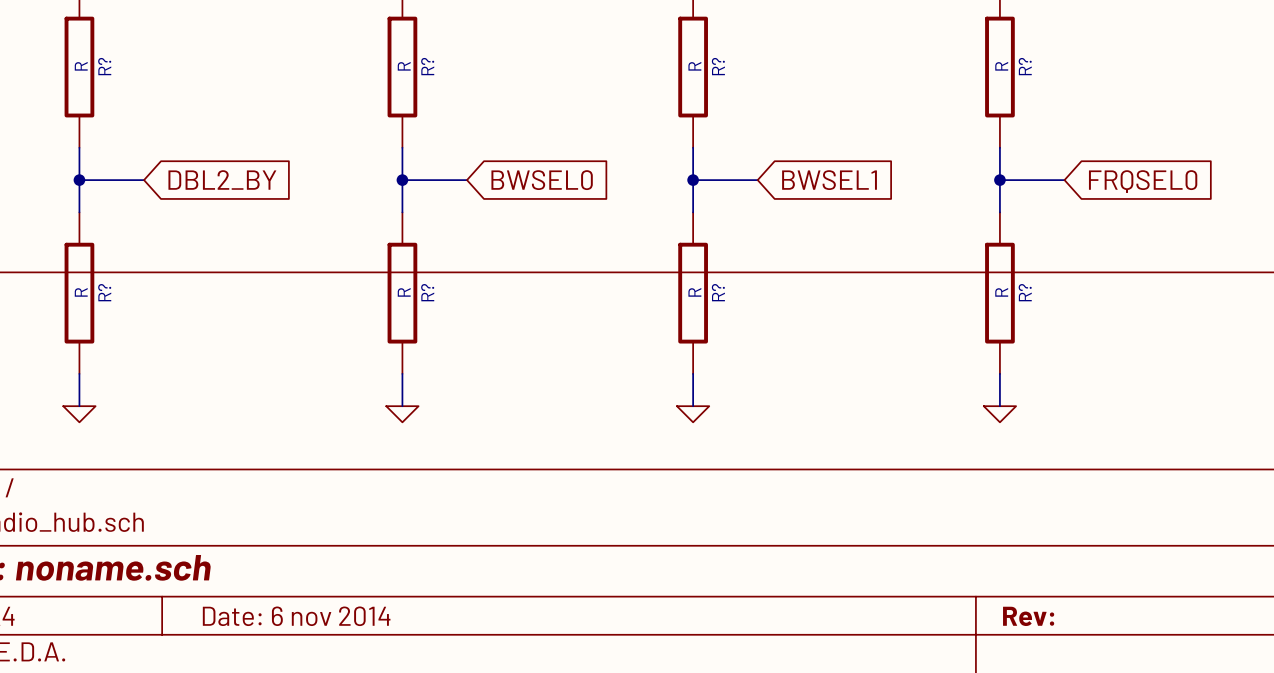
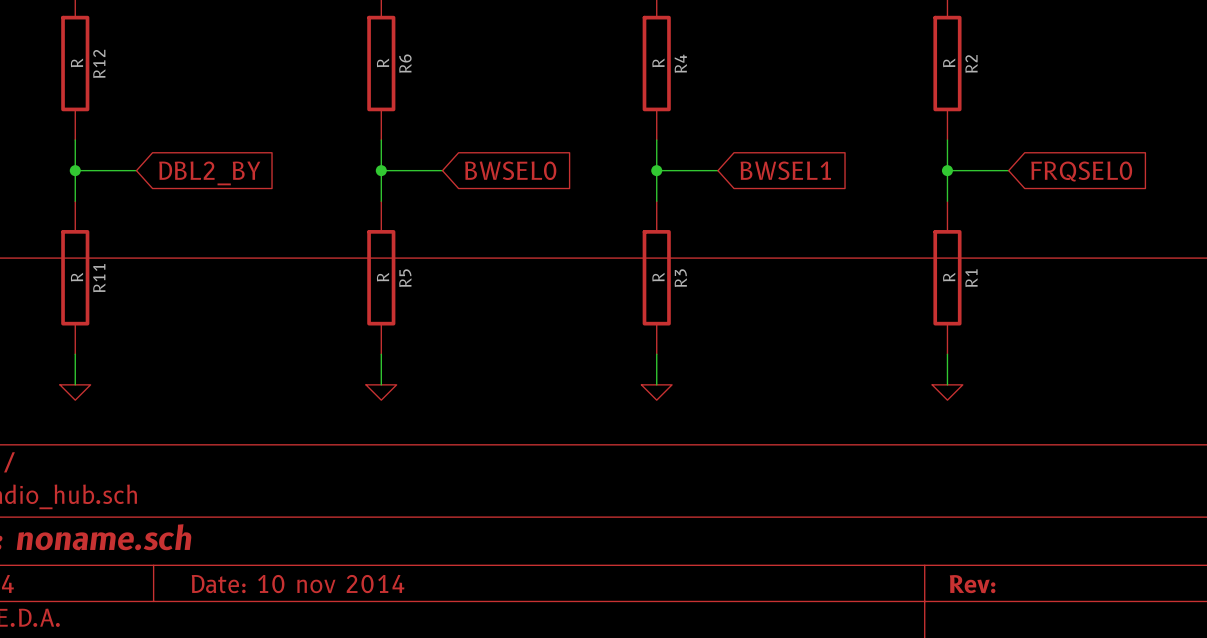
R? name: R? (104, 66) -> R12 (99, 63)
R? name: R? (427, 66) -> R6 (405, 63)
R? name: R? (718, 66) -> R4 (680, 63)
R? name: R? (1025, 66) -> R2 (971, 63)
R? name: R? (104, 292) -> R11 (99, 278)
R? name: R? (427, 292) -> R5 (405, 278)
R? name: R? (718, 292) -> R3 (680, 278)
R? name: R? (1025, 292) -> R1 (971, 278)
title block: Date: 6 nov 2014 (296, 616) -> Date: 10 nov 2014 (298, 584)

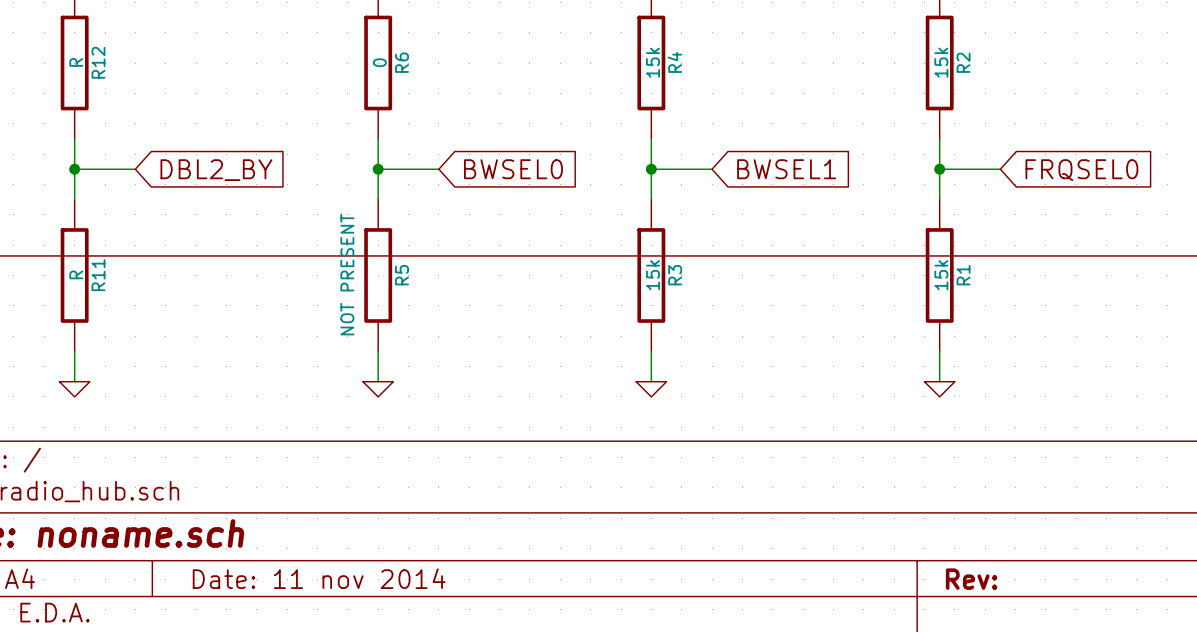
R6 value: R (383, 62) -> 0 (379, 62)
R4 value: R (658, 62) -> 15k (653, 62)
R2 value: R (949, 62) -> 15k (941, 62)
R5 value: R (383, 277) -> NOT PRESENT (347, 274)
R3 value: R (658, 277) -> 15k (653, 275)
R1 value: R (949, 277) -> 15k (941, 275)
title block: Date: 10 nov 2014 (298, 584) -> Date: 11 nov 2014 (319, 578)

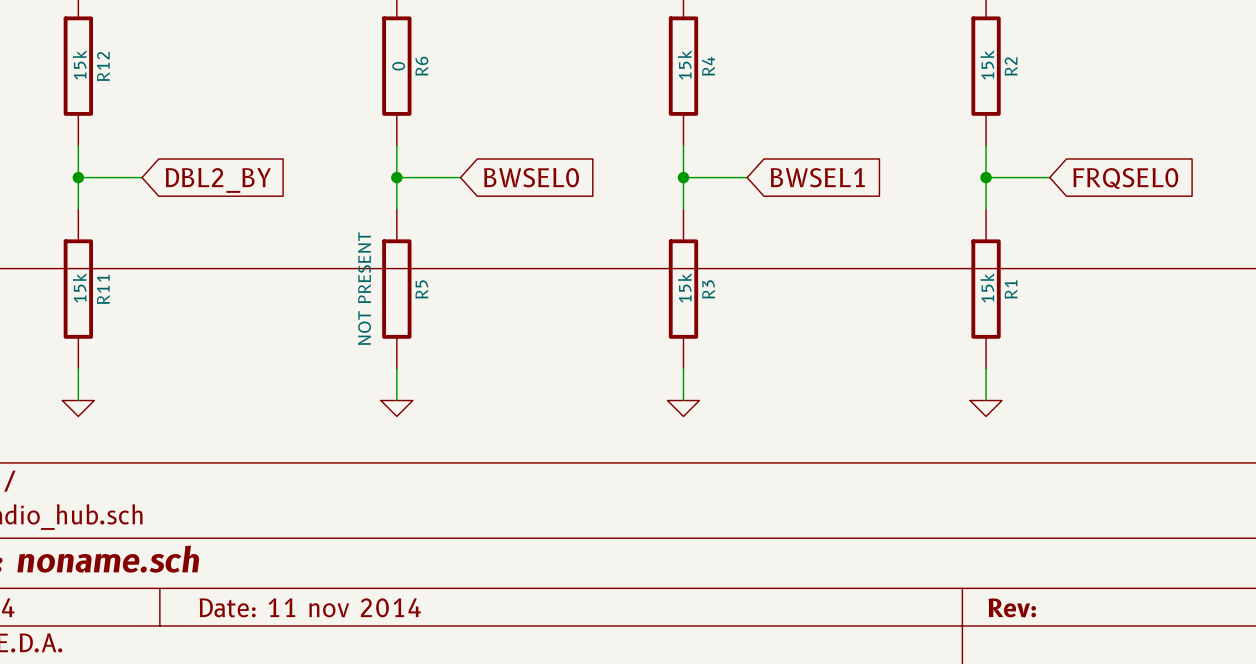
R12 value: R (76, 62) -> 15k (79, 64)
R11 value: R (76, 274) -> 15k (79, 287)

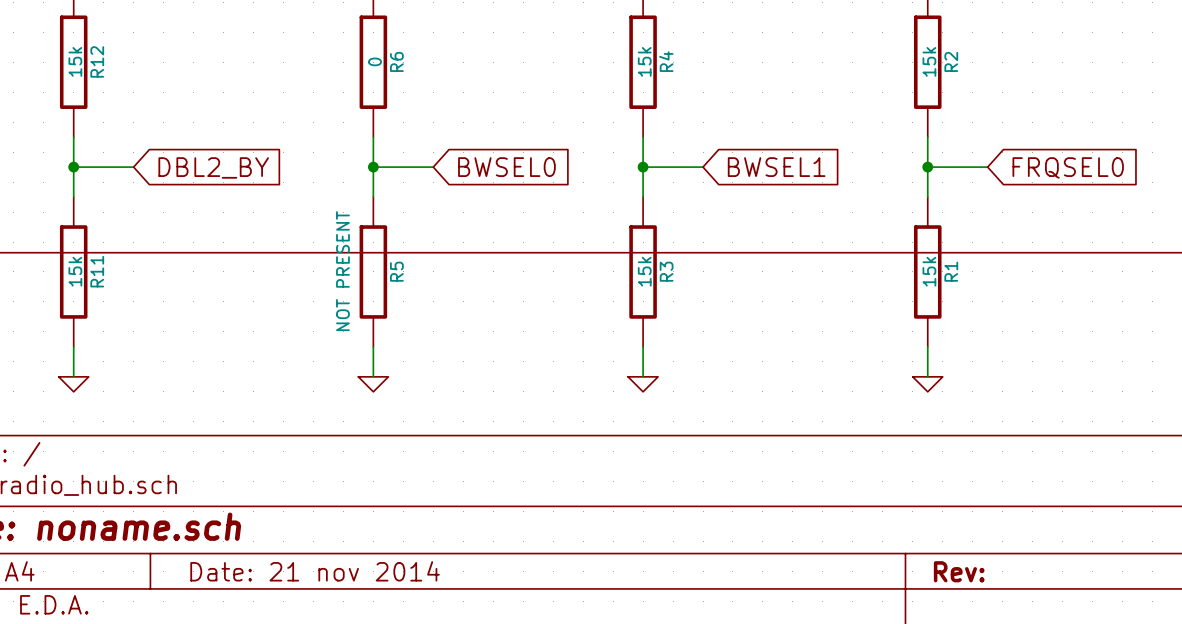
title block: Date: 11 nov 2014 (310, 607) -> Date: 21 nov 2014 (315, 571)

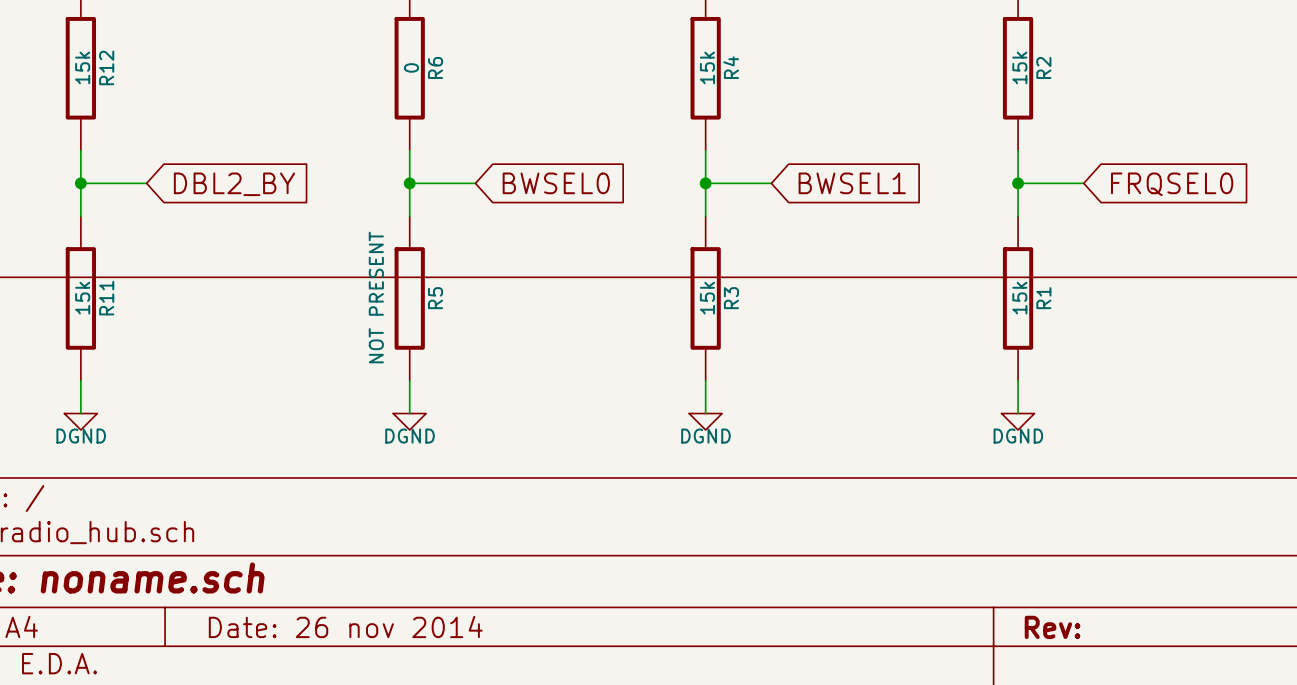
power symbol text: none -> DGND (81, 436)
power symbol text: none -> DGND (410, 436)
power symbol text: none -> DGND (705, 436)
power symbol text: none -> DGND (1018, 436)
title block: Date: 21 nov 2014 (315, 571) -> Date: 26 nov 2014 (345, 626)

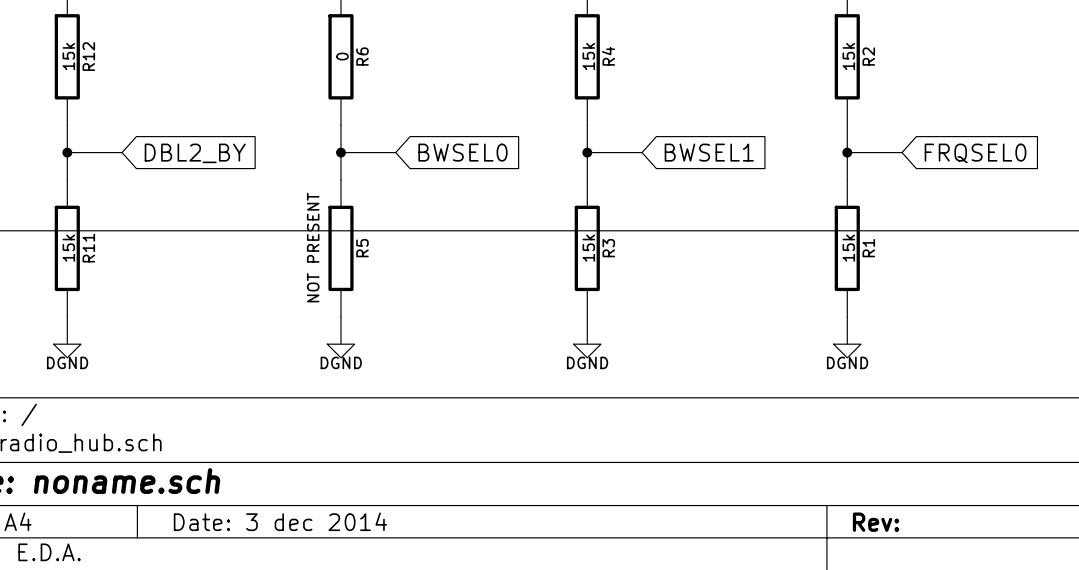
title block: Date: 26 nov 2014 (345, 626) -> Date: 3 dec 2014 (280, 521)

